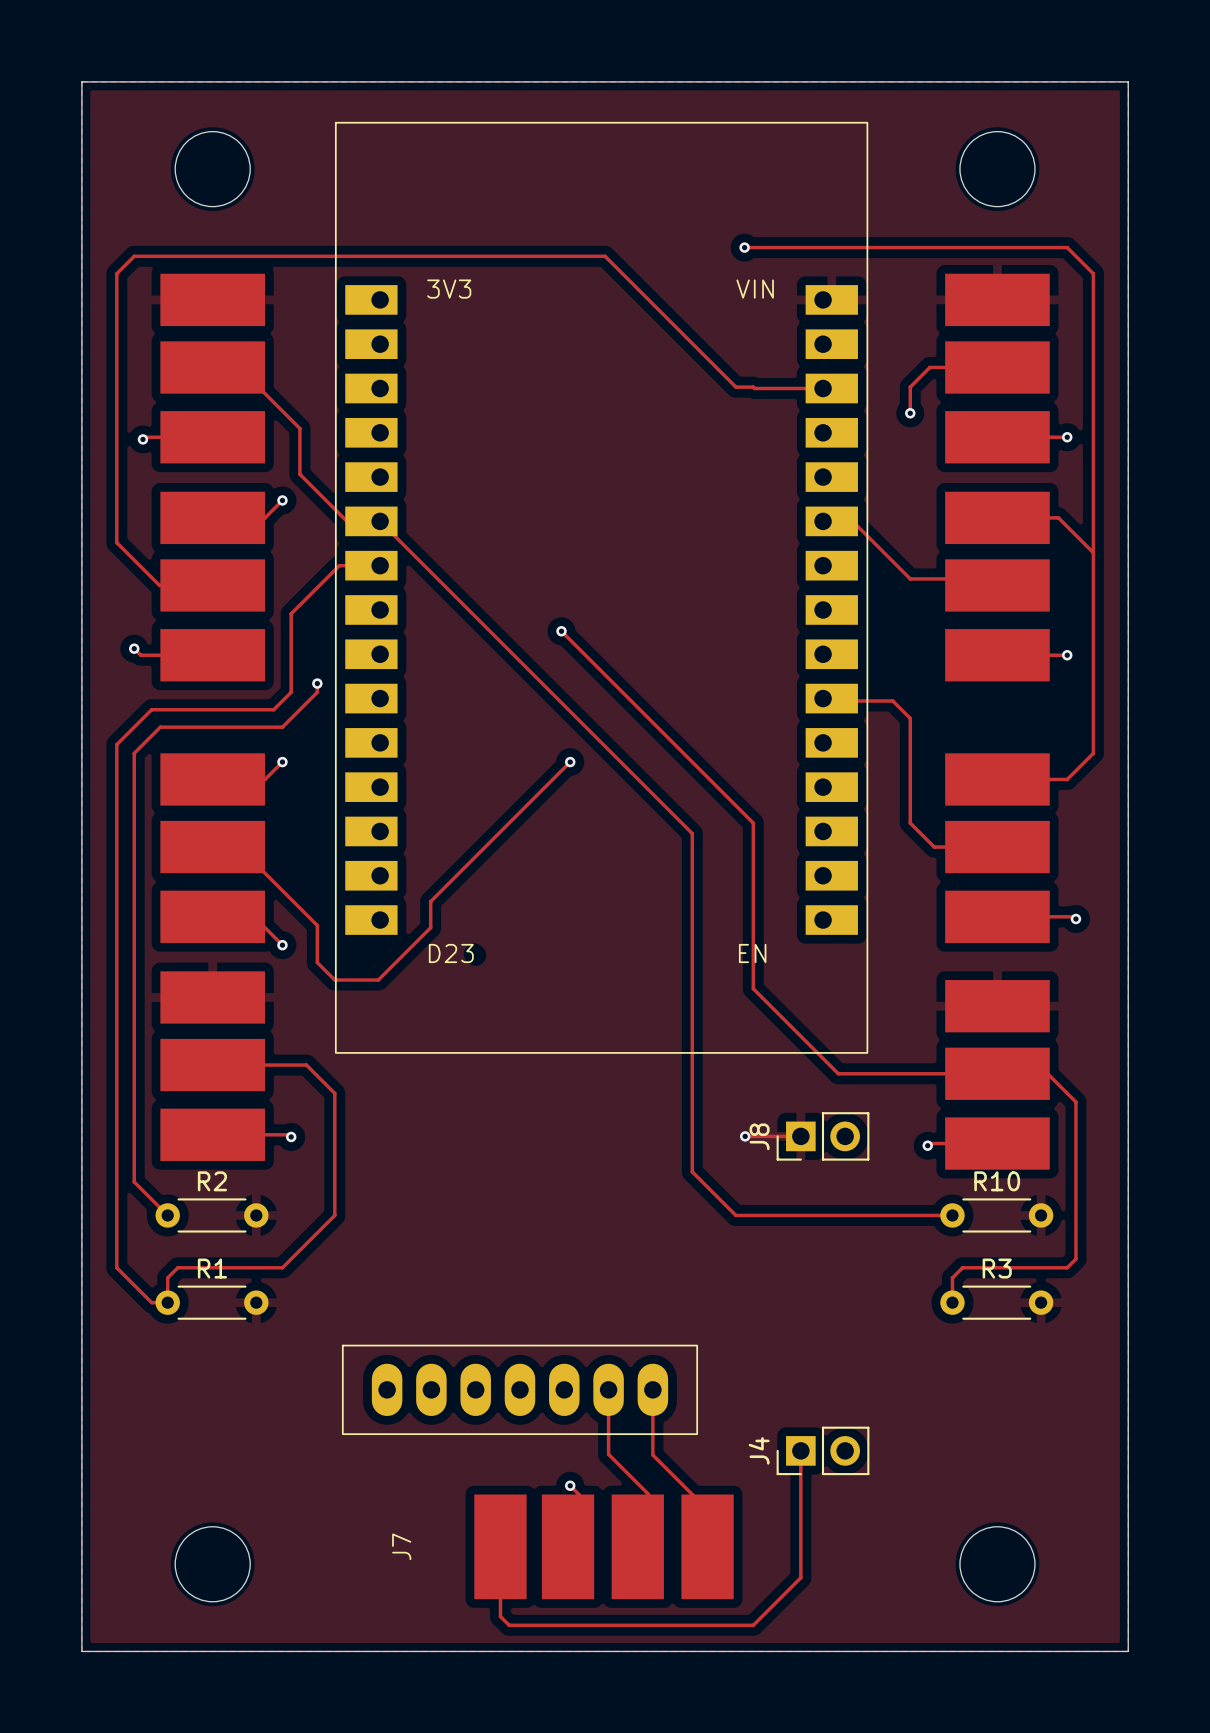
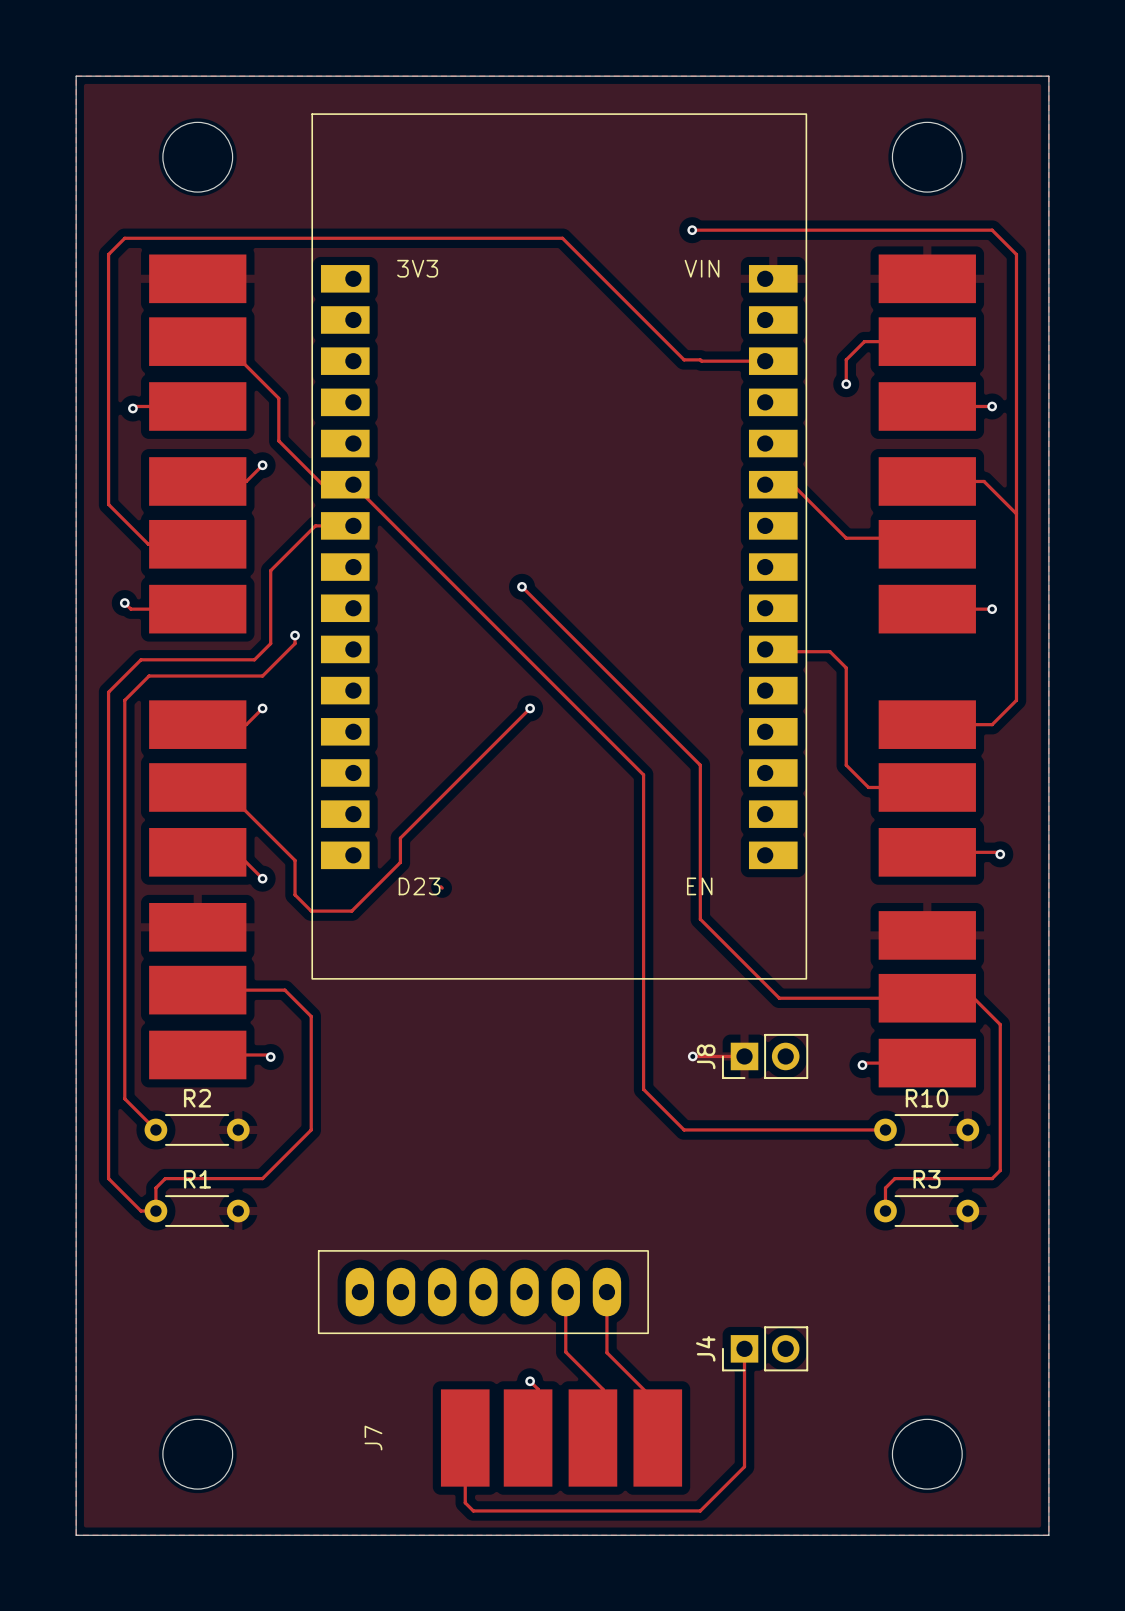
track: none -> (440, 886) (442, 888)

